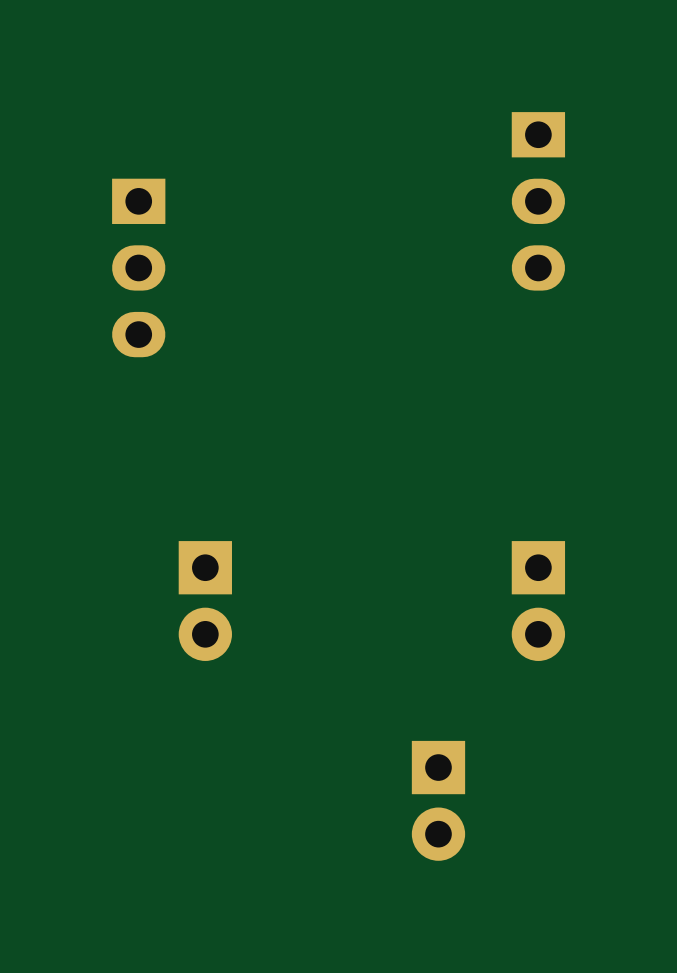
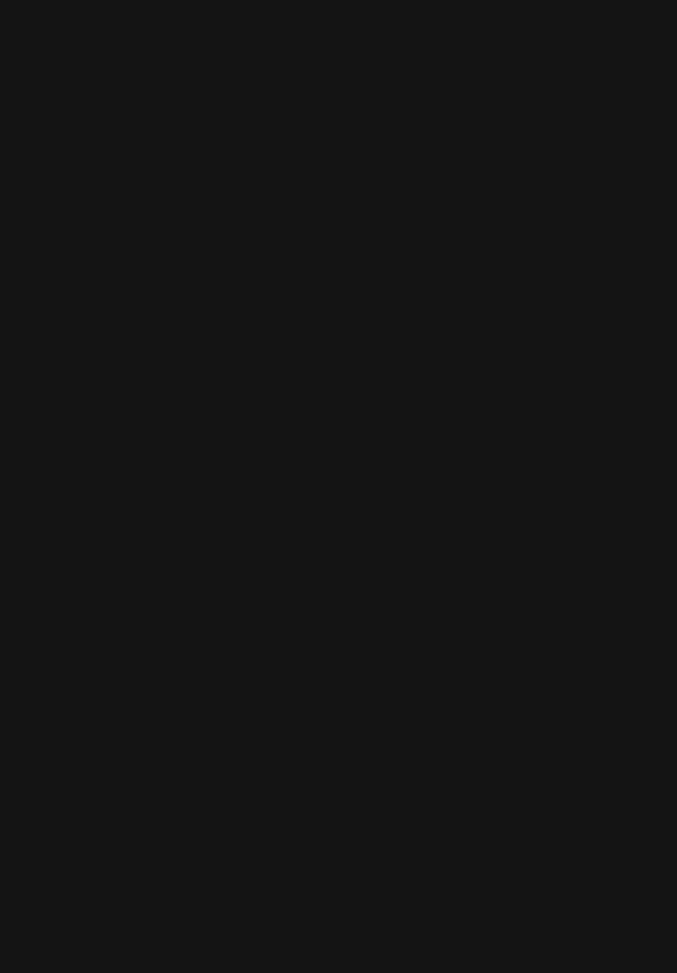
part: (538, 201) -> none
part: (138, 267) -> none
part: (205, 601) -> none
part: (538, 601) -> none
part: (438, 800) -> none

